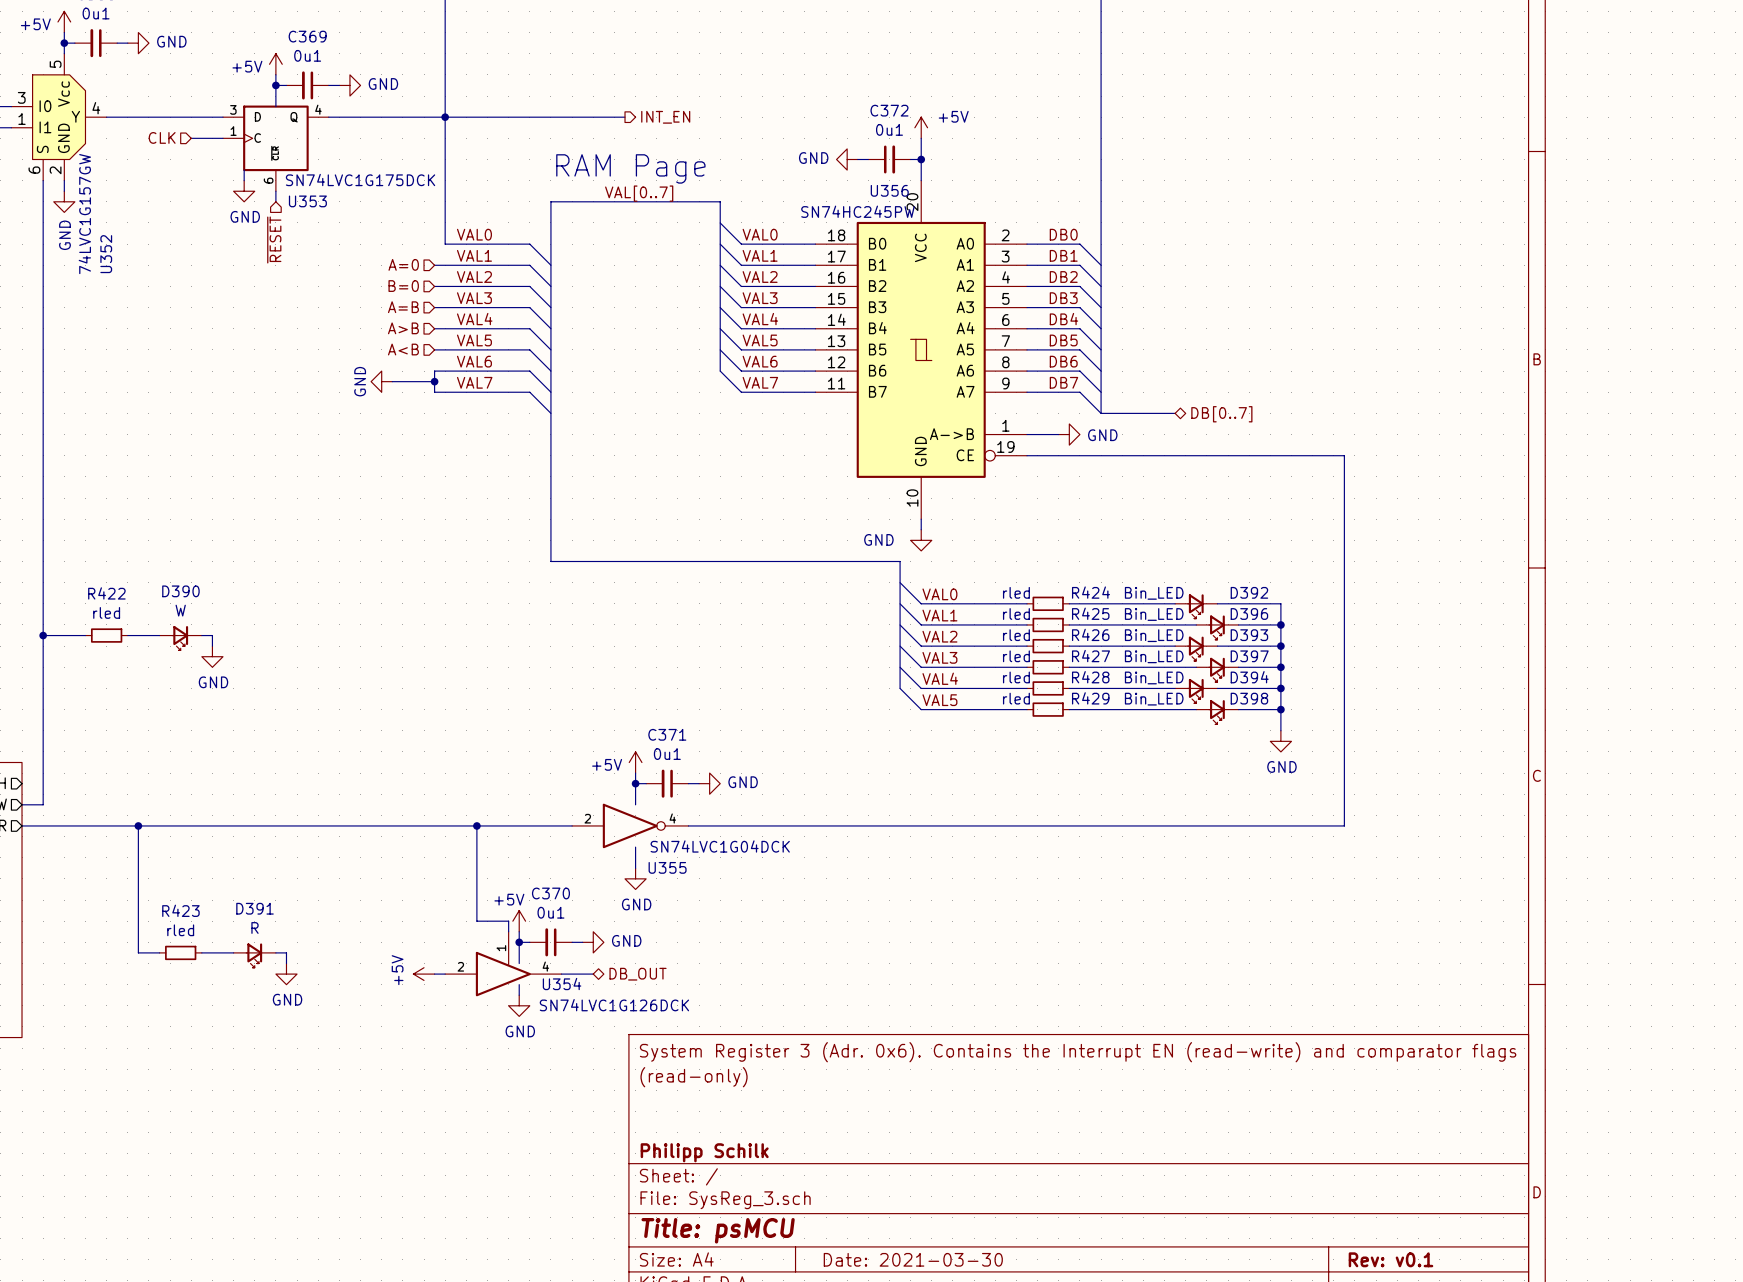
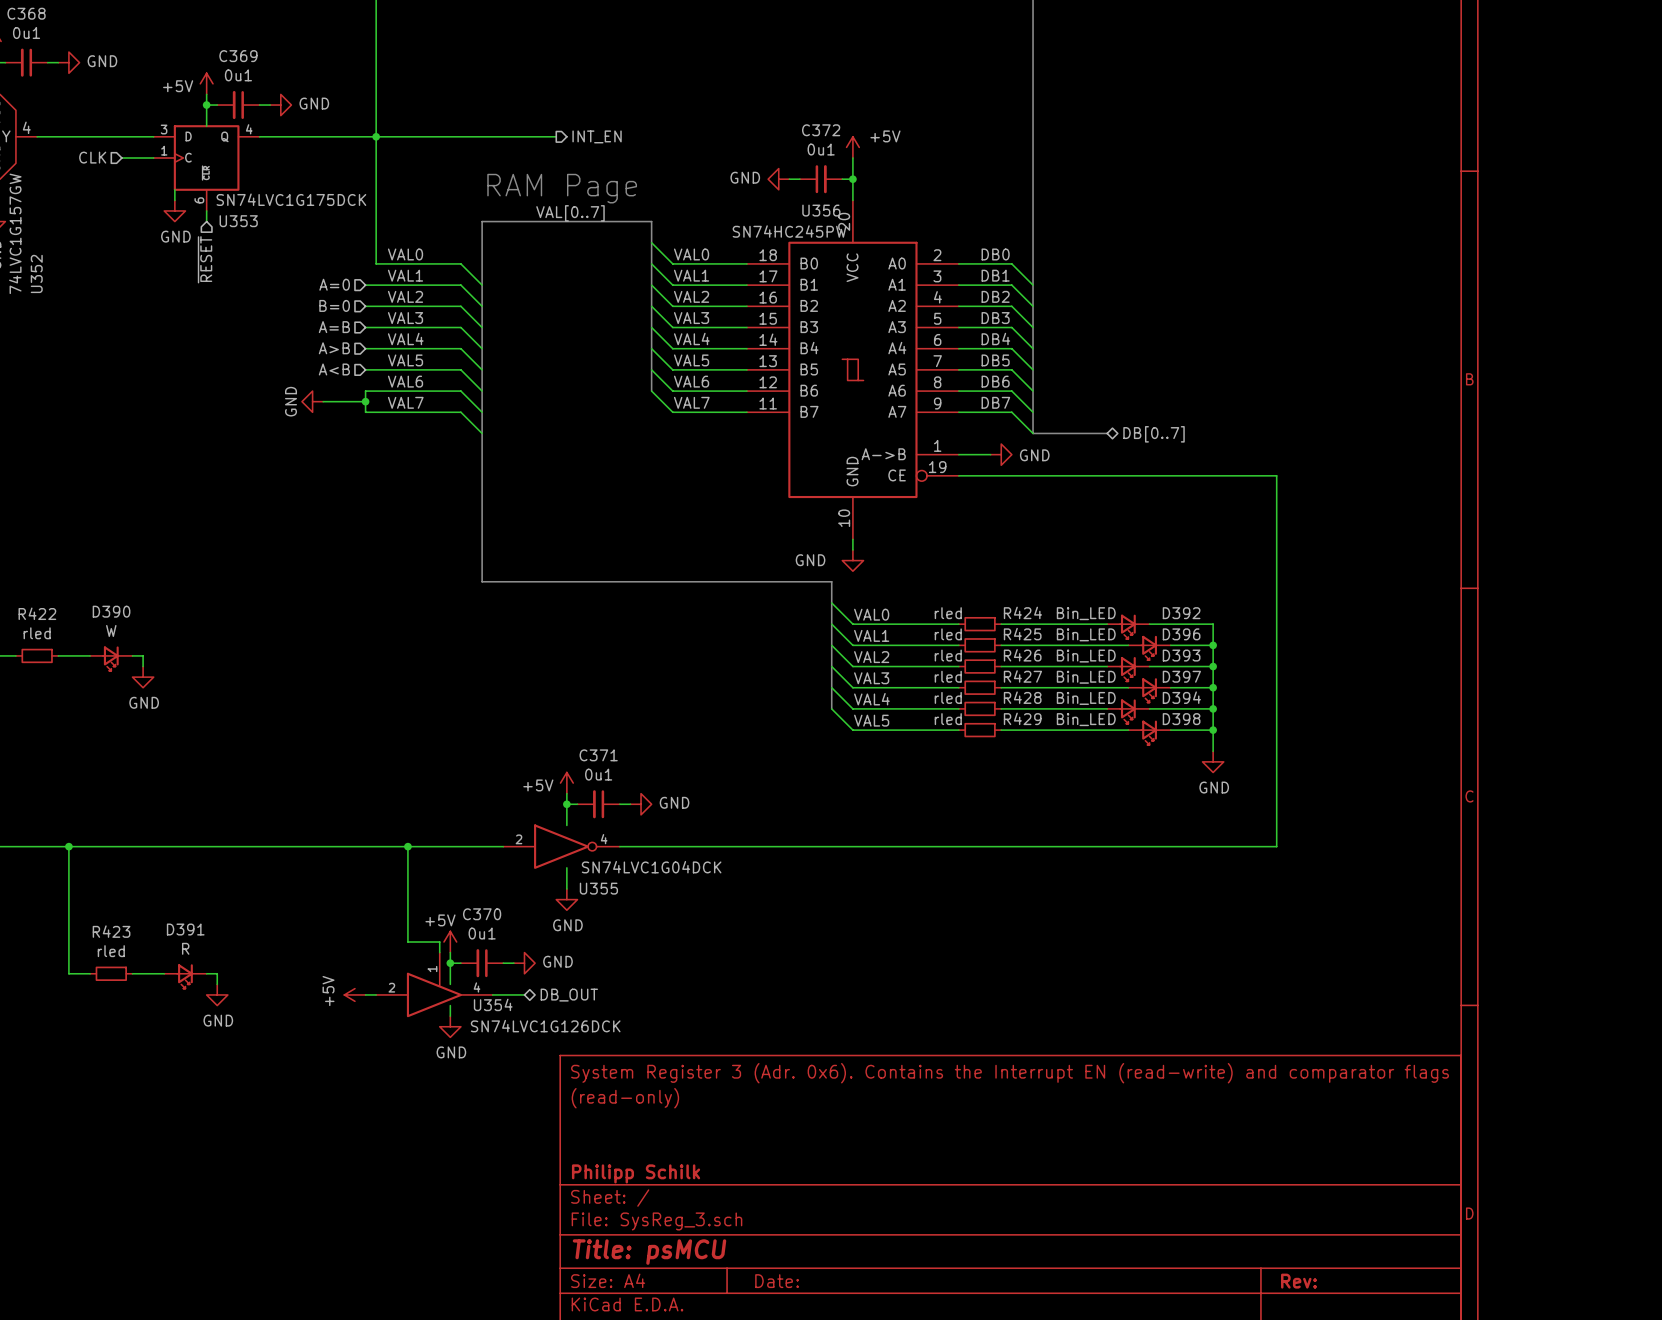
title block: Date: 2021-03-30 (913, 1259) -> Date: (777, 1281)
title block: Rev: v0.1 (1390, 1259) -> Rev: (1298, 1281)

